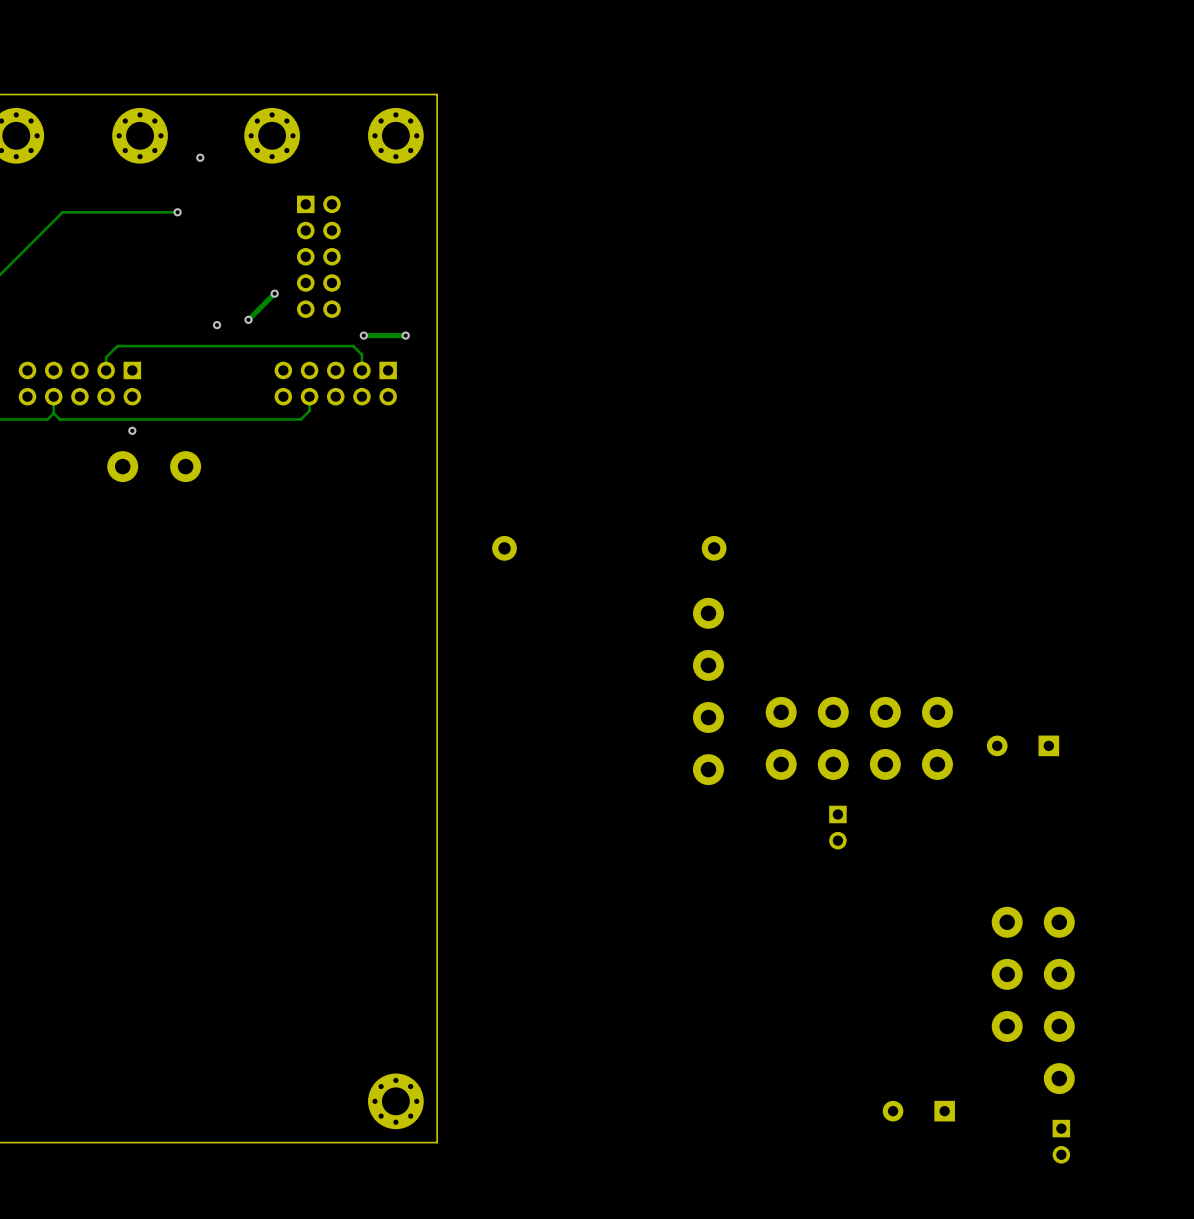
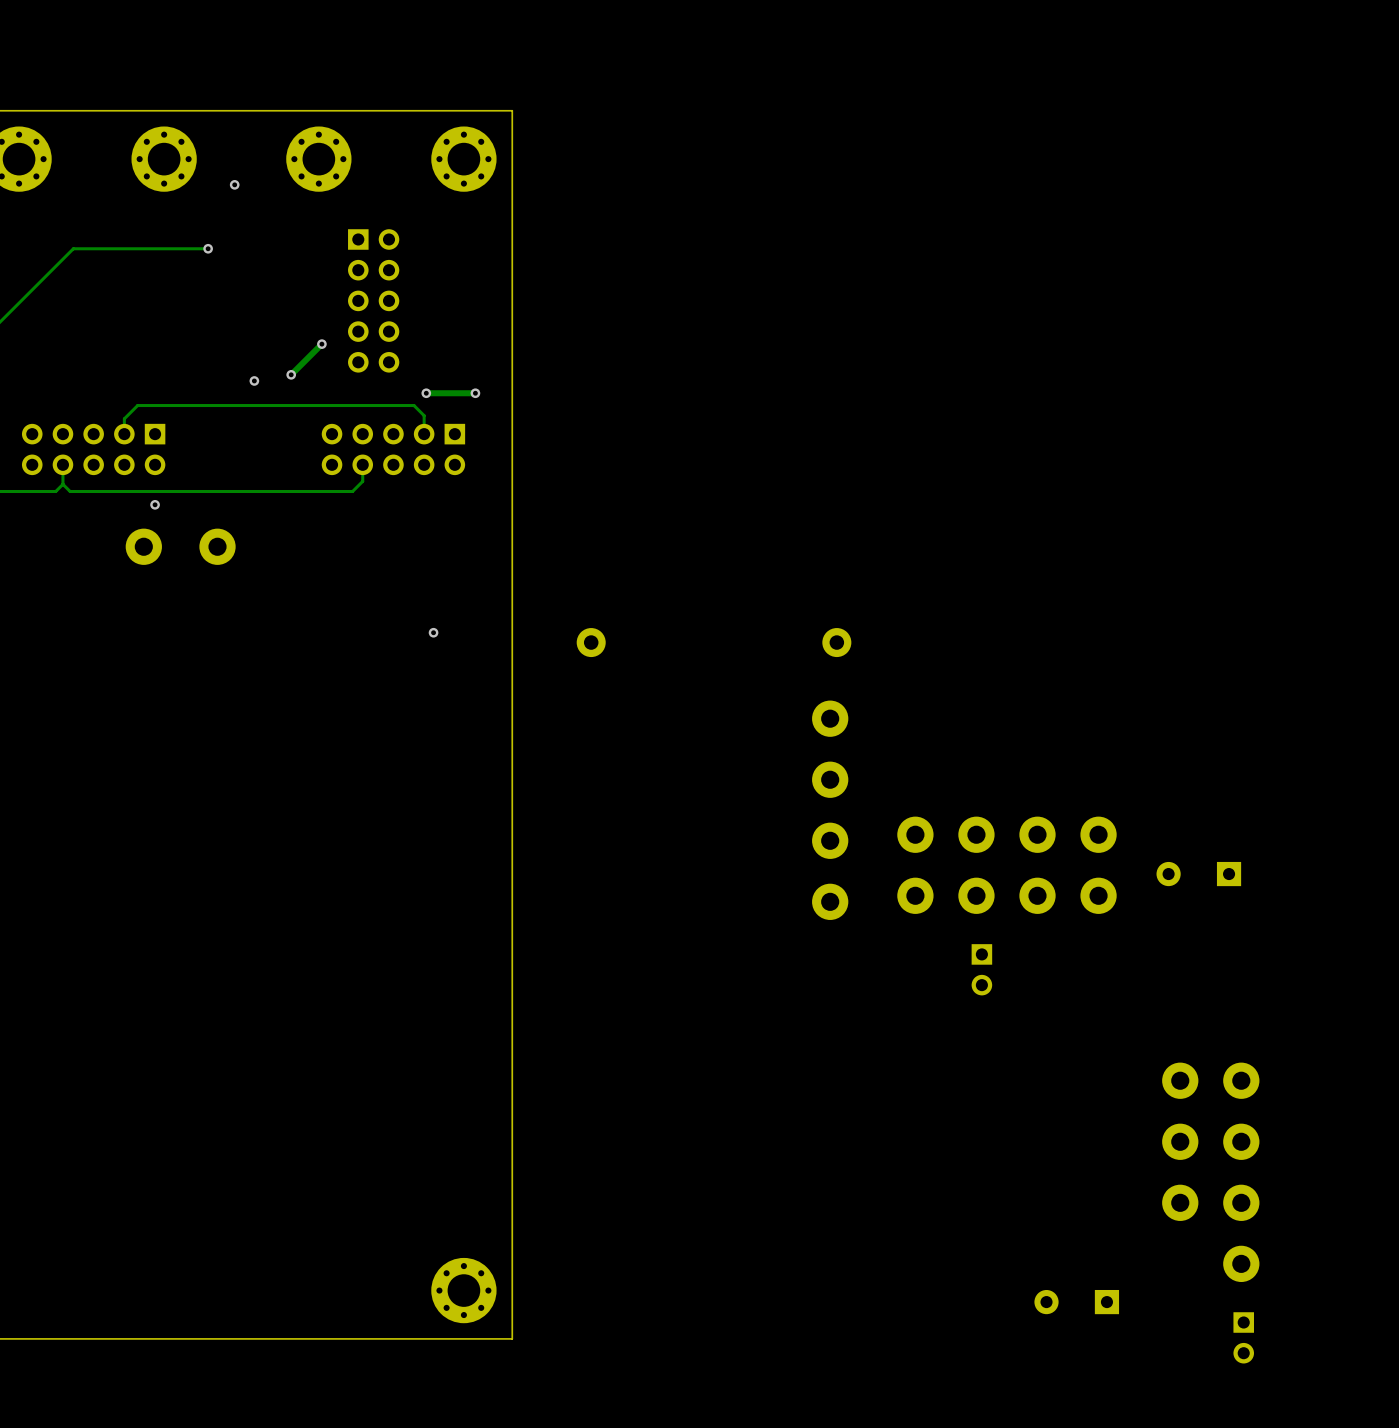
via: none -> (433, 632)

